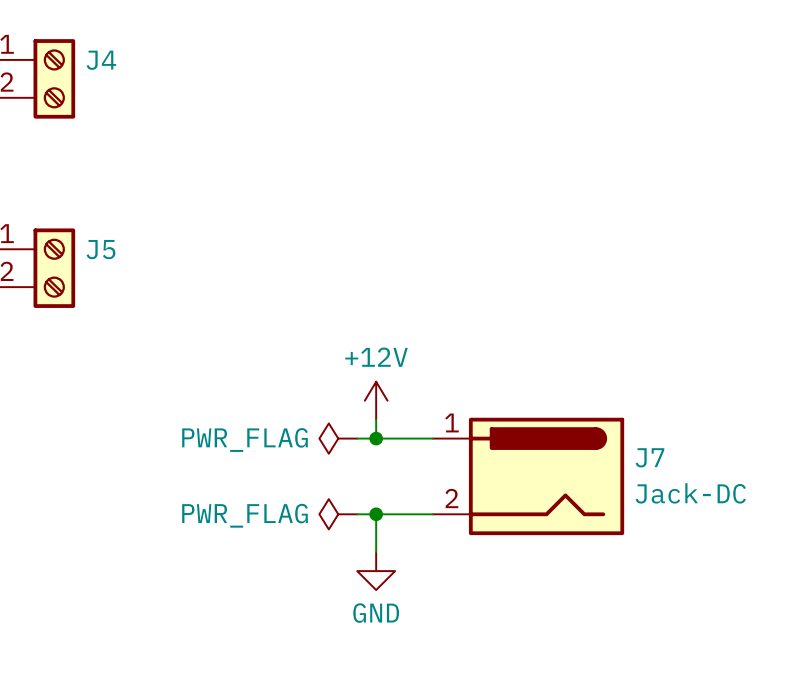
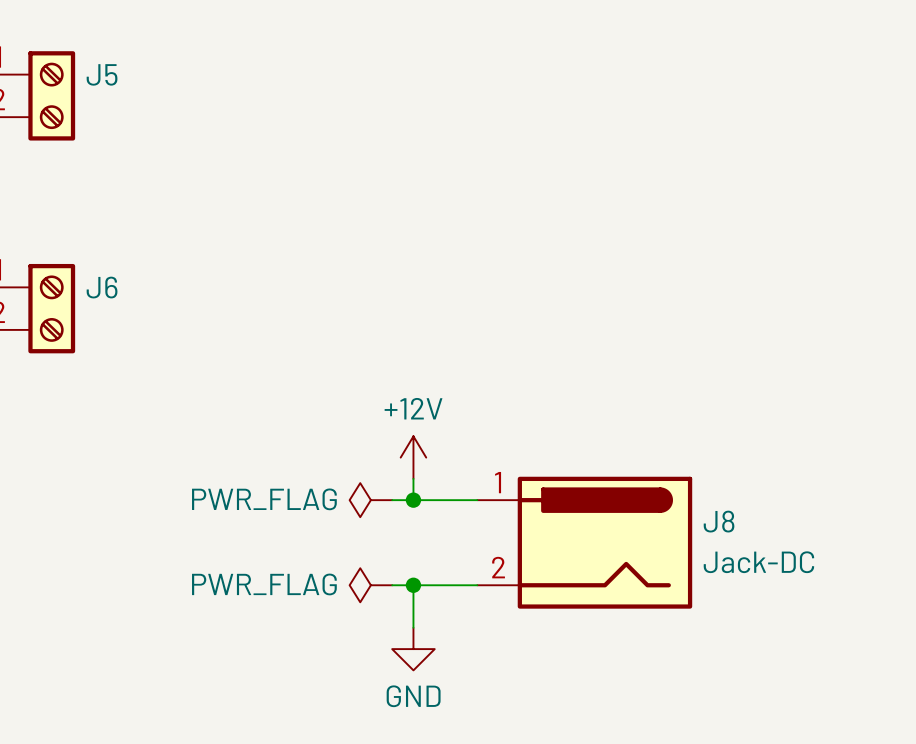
J4 name: J4 (101, 60) -> J5 (102, 74)
J5 name: J5 (101, 249) -> J6 (102, 287)
J7 name: J7 (649, 457) -> J8 (719, 521)

